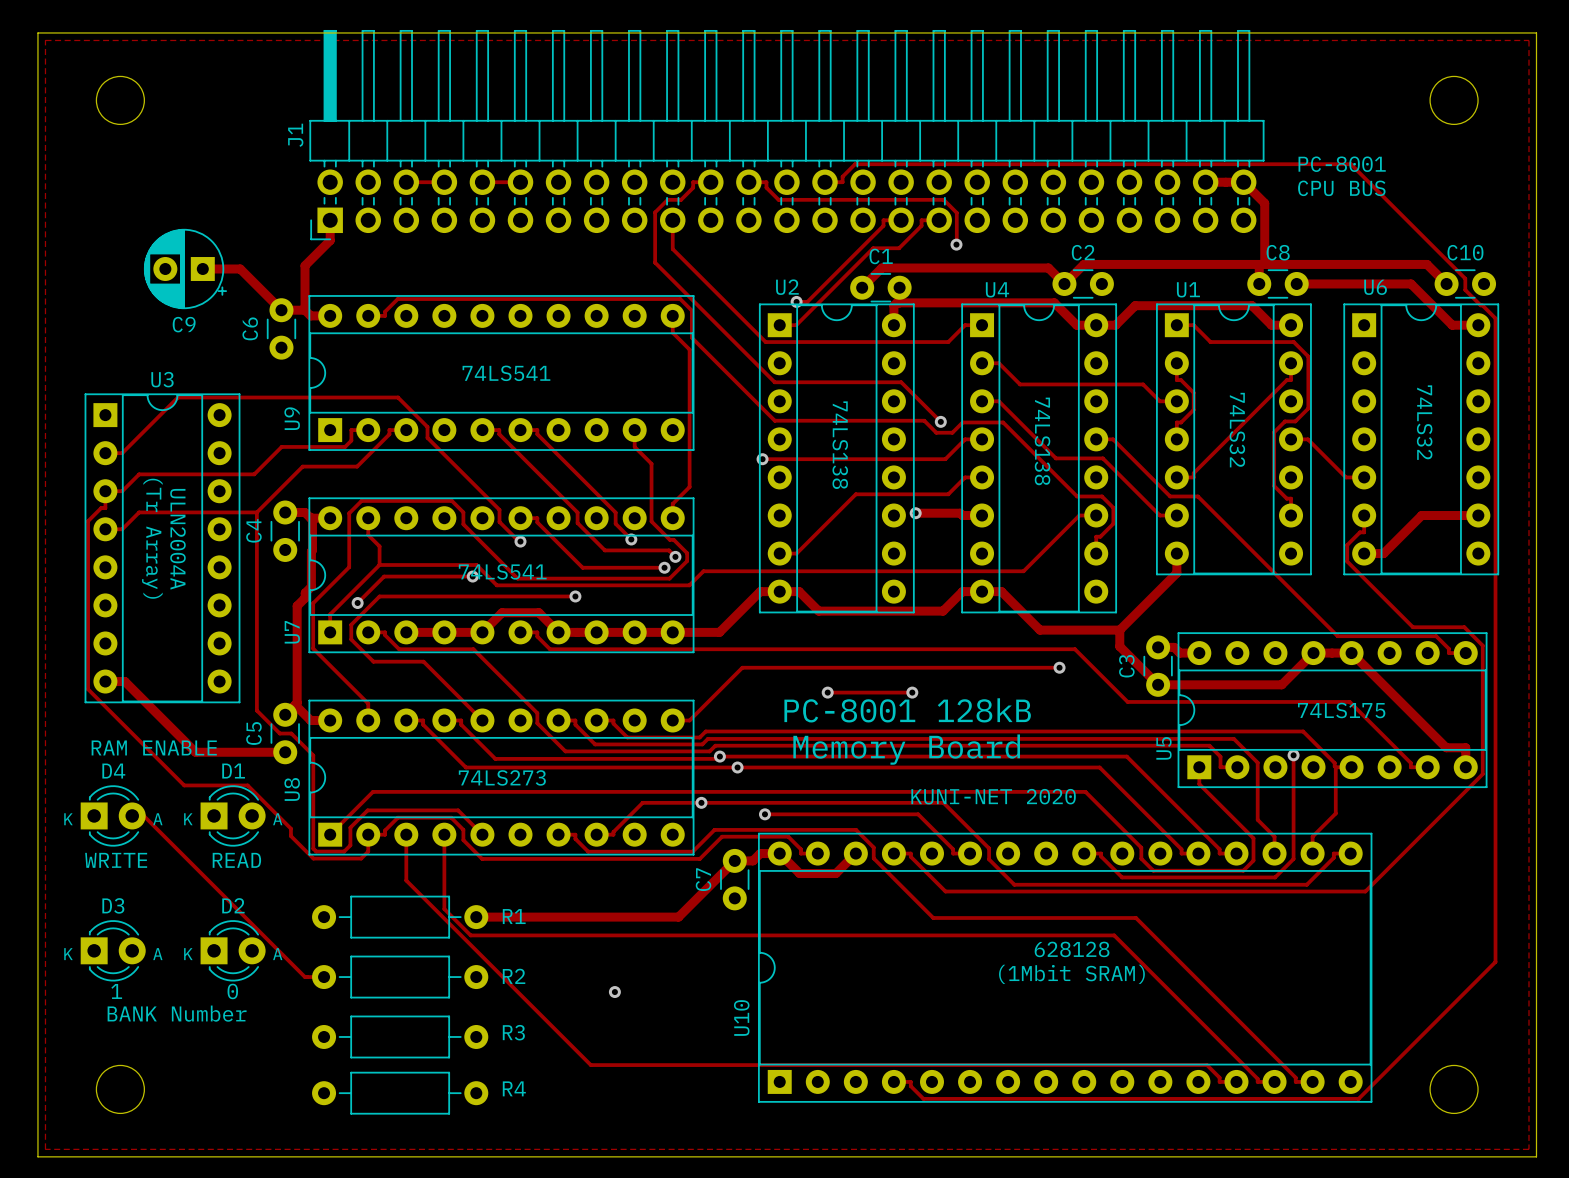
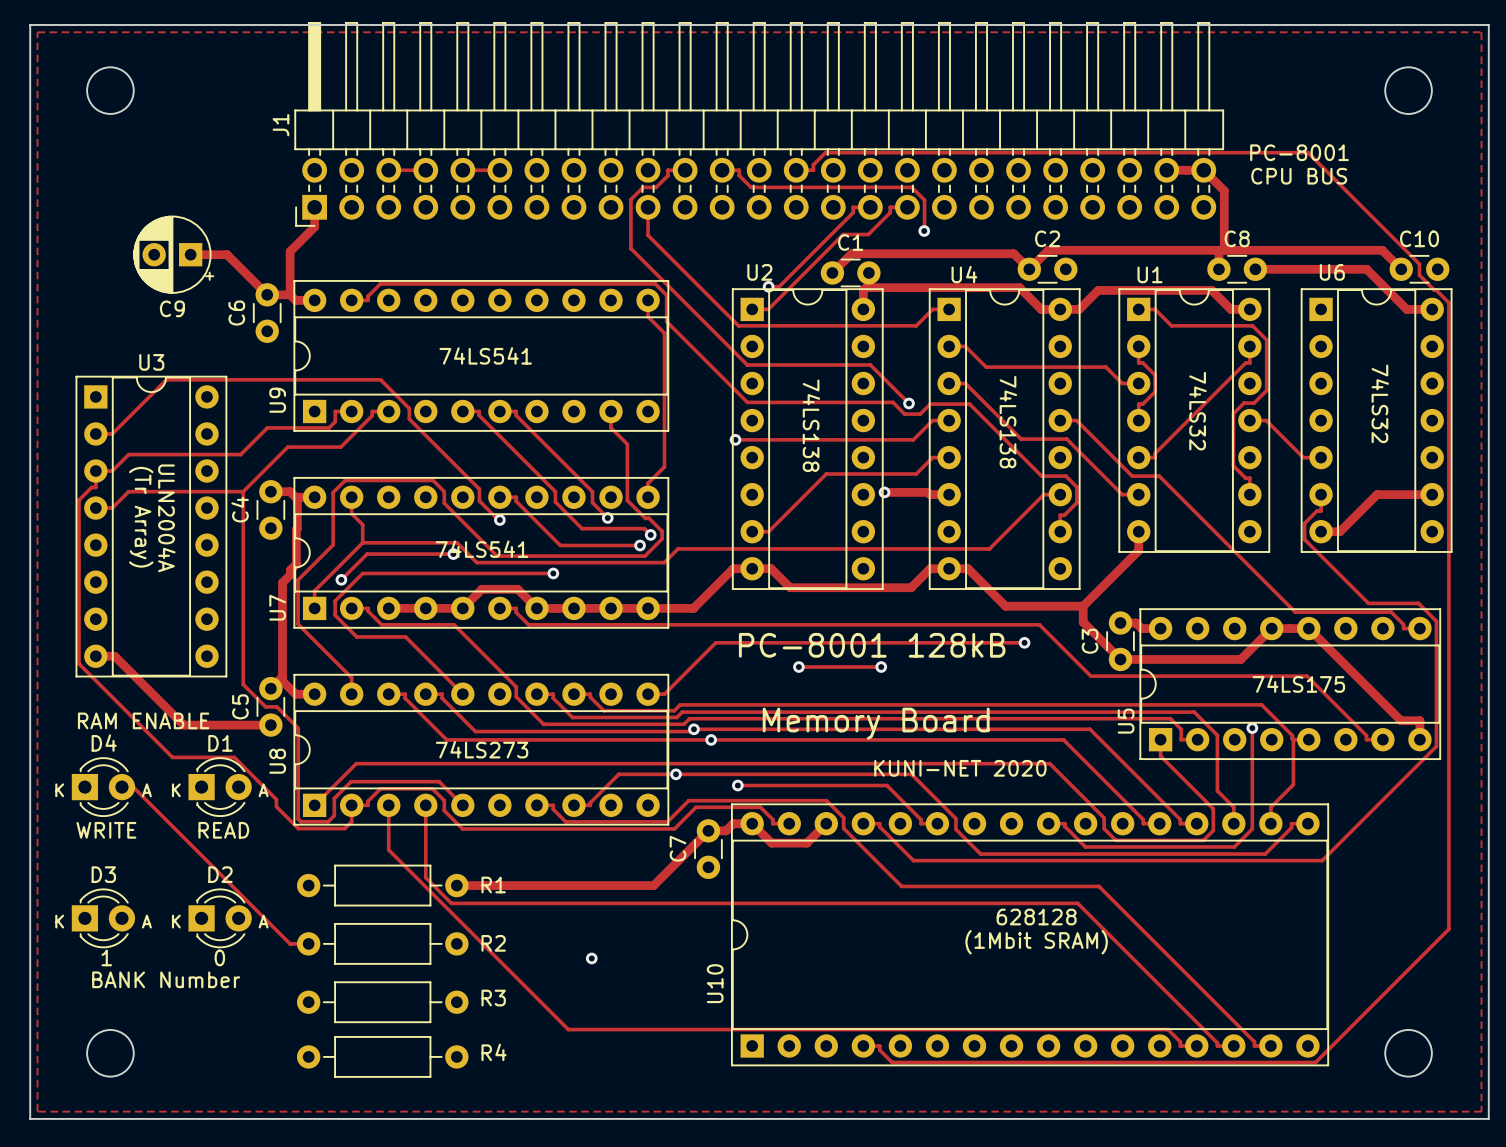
text position: PC-8001 128kB (907, 710) -> PC-8001 128kB (872, 645)

